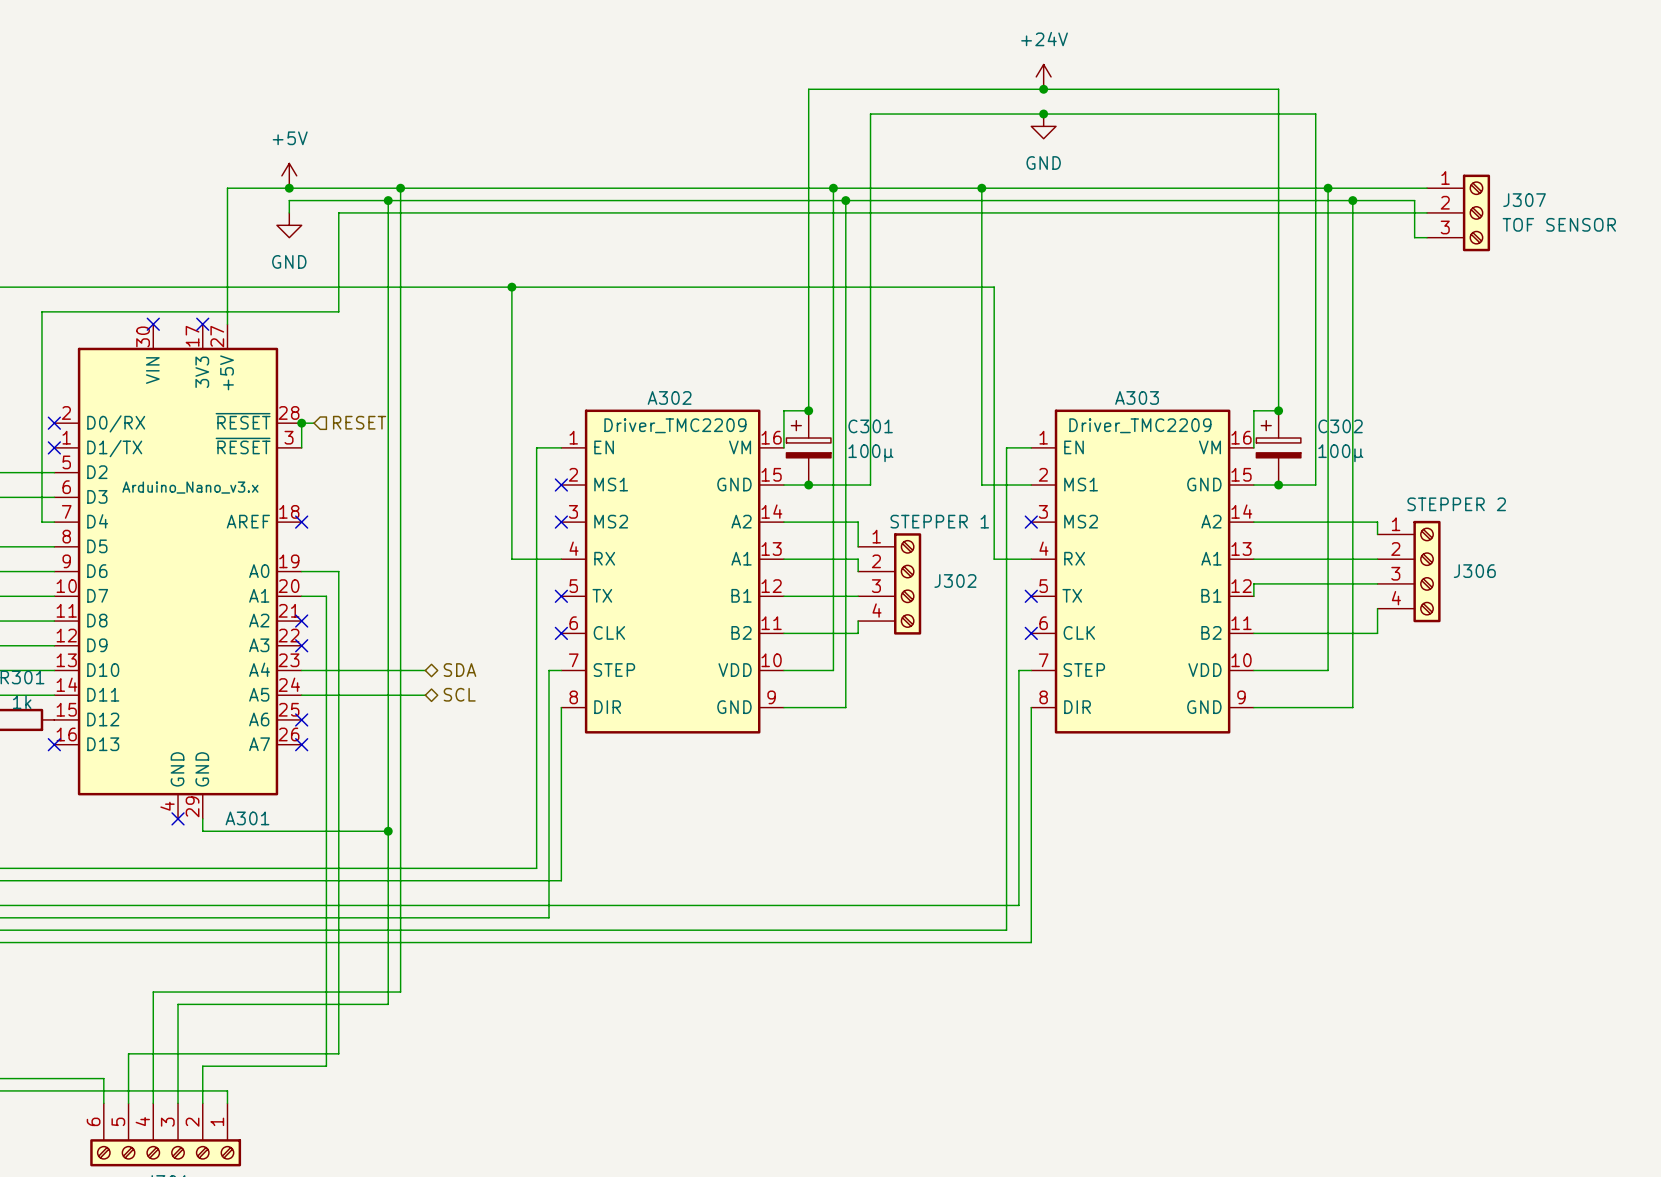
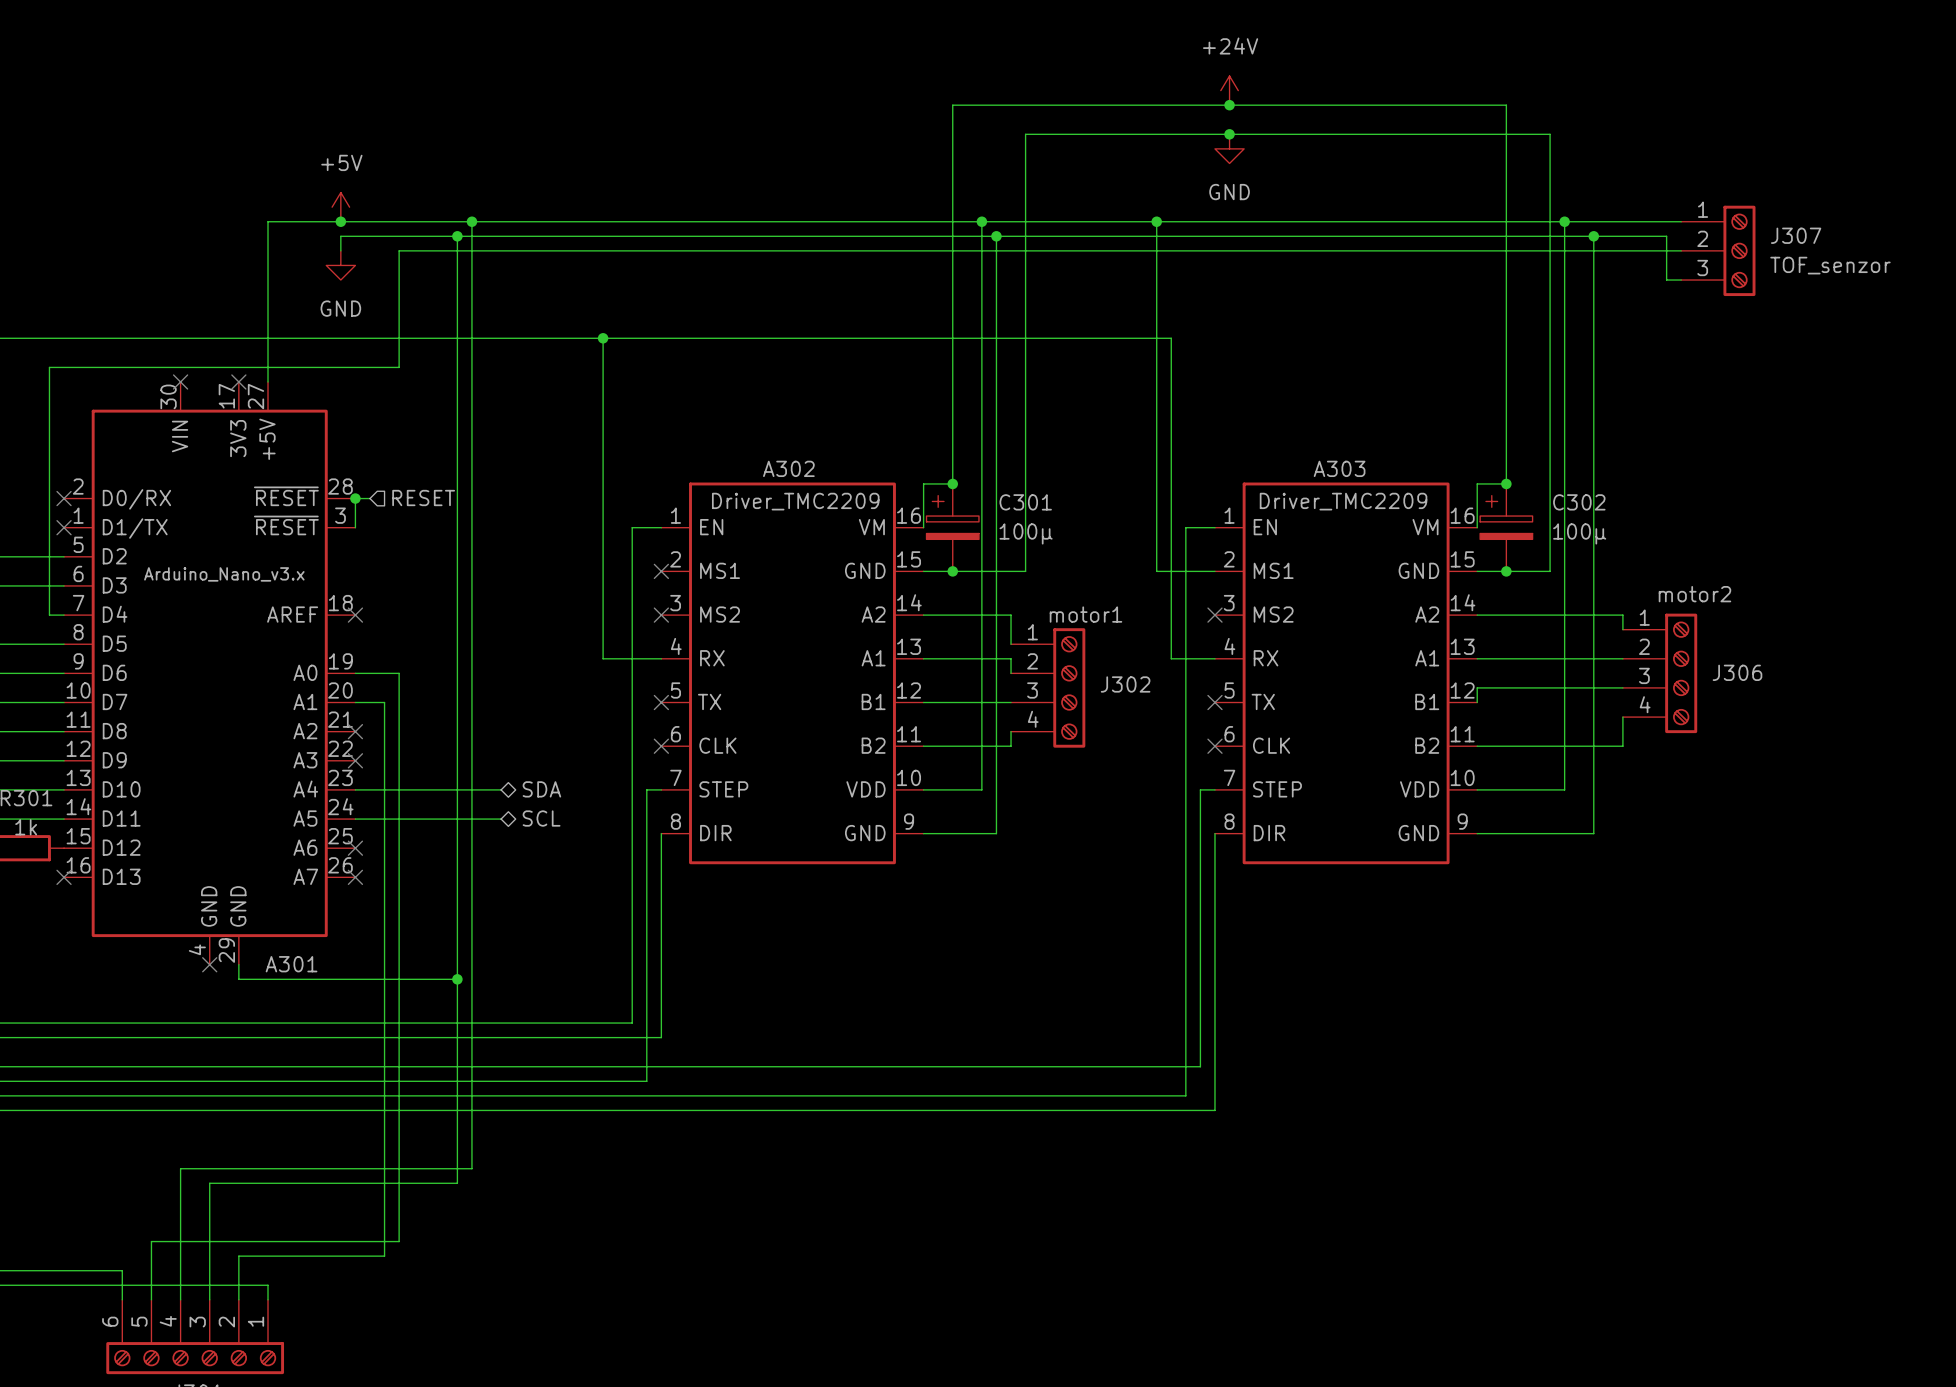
J307 value: TOF SENSOR (1559, 224) -> TOF_senzor (1830, 265)
J306 value: STEPPER 2 (1456, 504) -> motor2 (1694, 594)
J302 value: STEPPER 1 (939, 521) -> motor1 (1085, 614)

